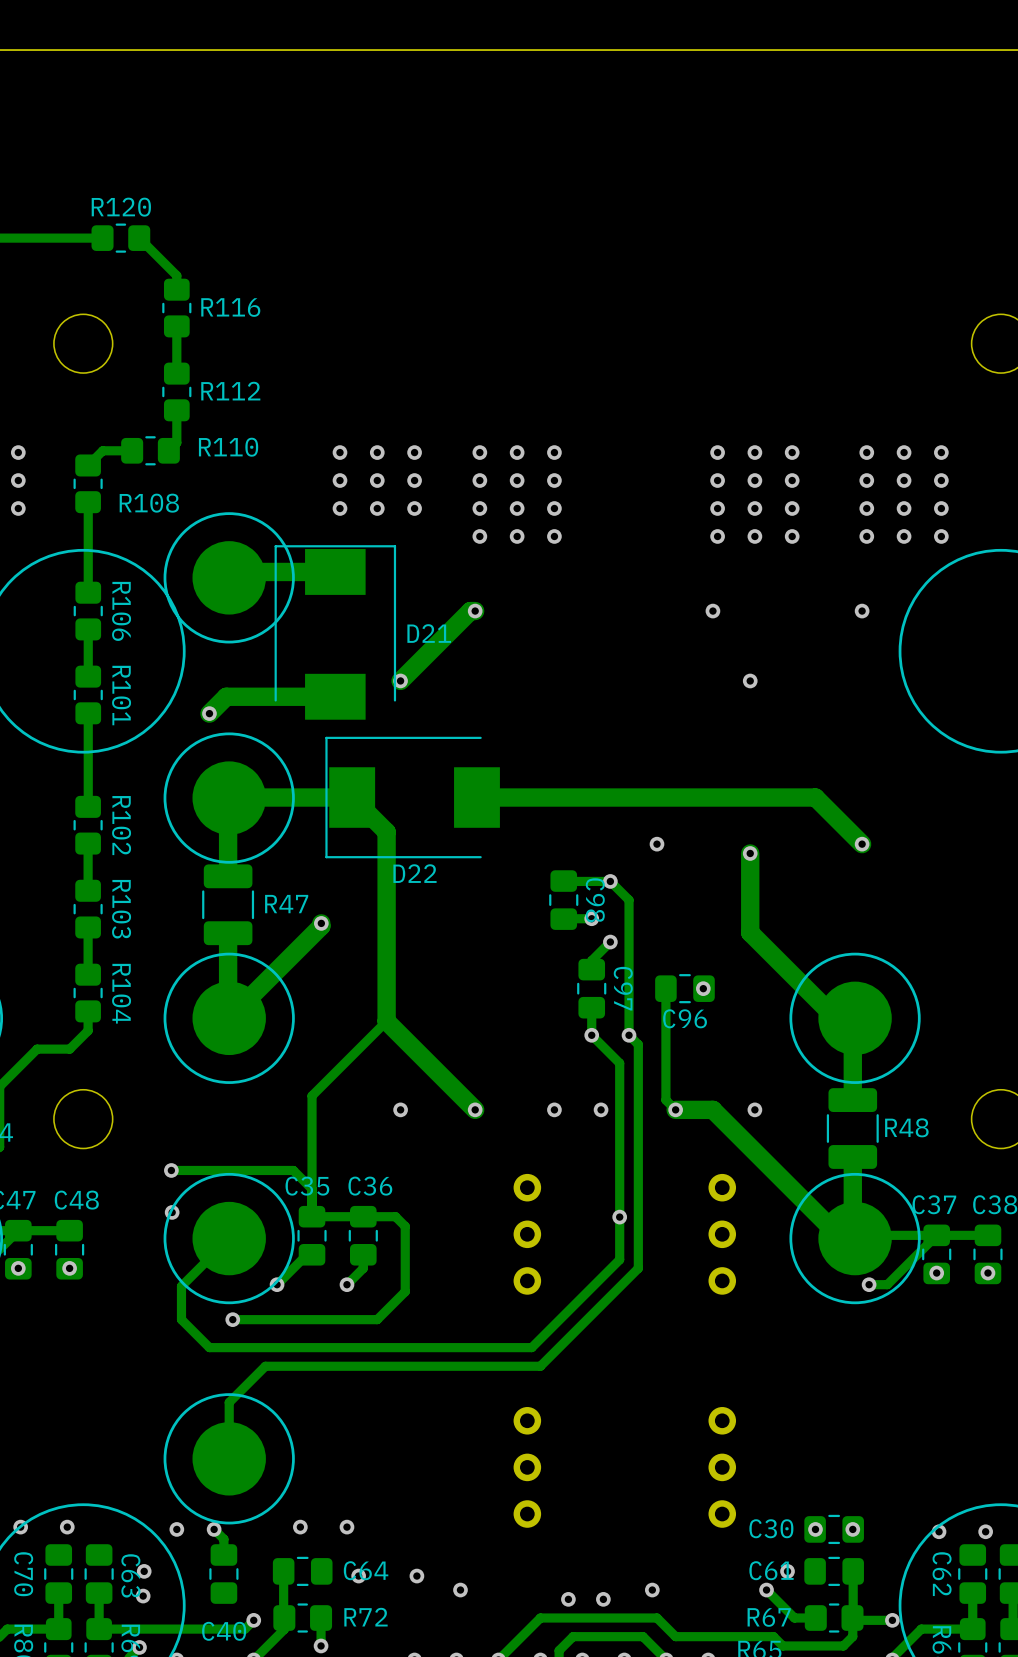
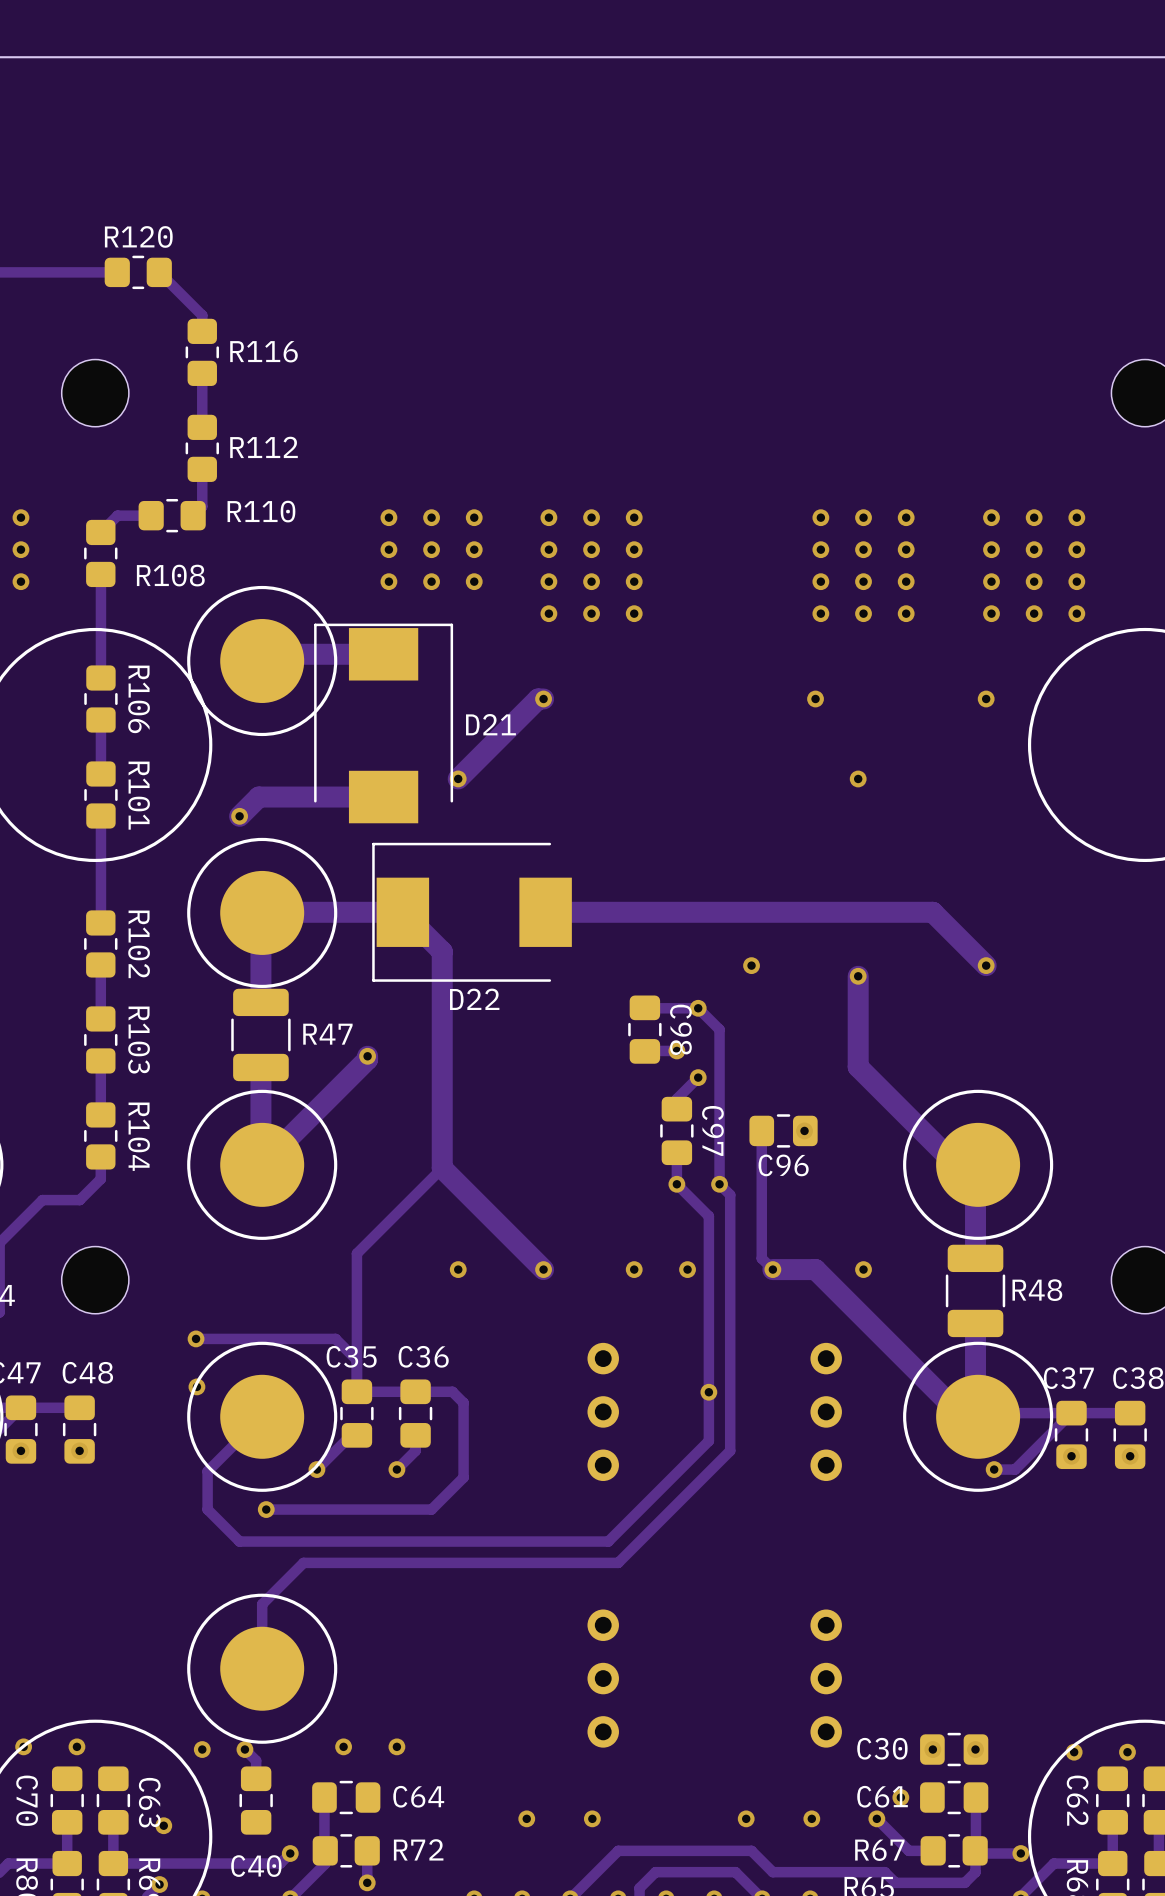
via: (144, 1571) -> none
via: (358, 1576) -> none
via: (416, 1576) -> none
via: none -> (592, 1818)
via: none -> (811, 1818)
via: (568, 1599) -> none
via: (603, 1599) -> none

